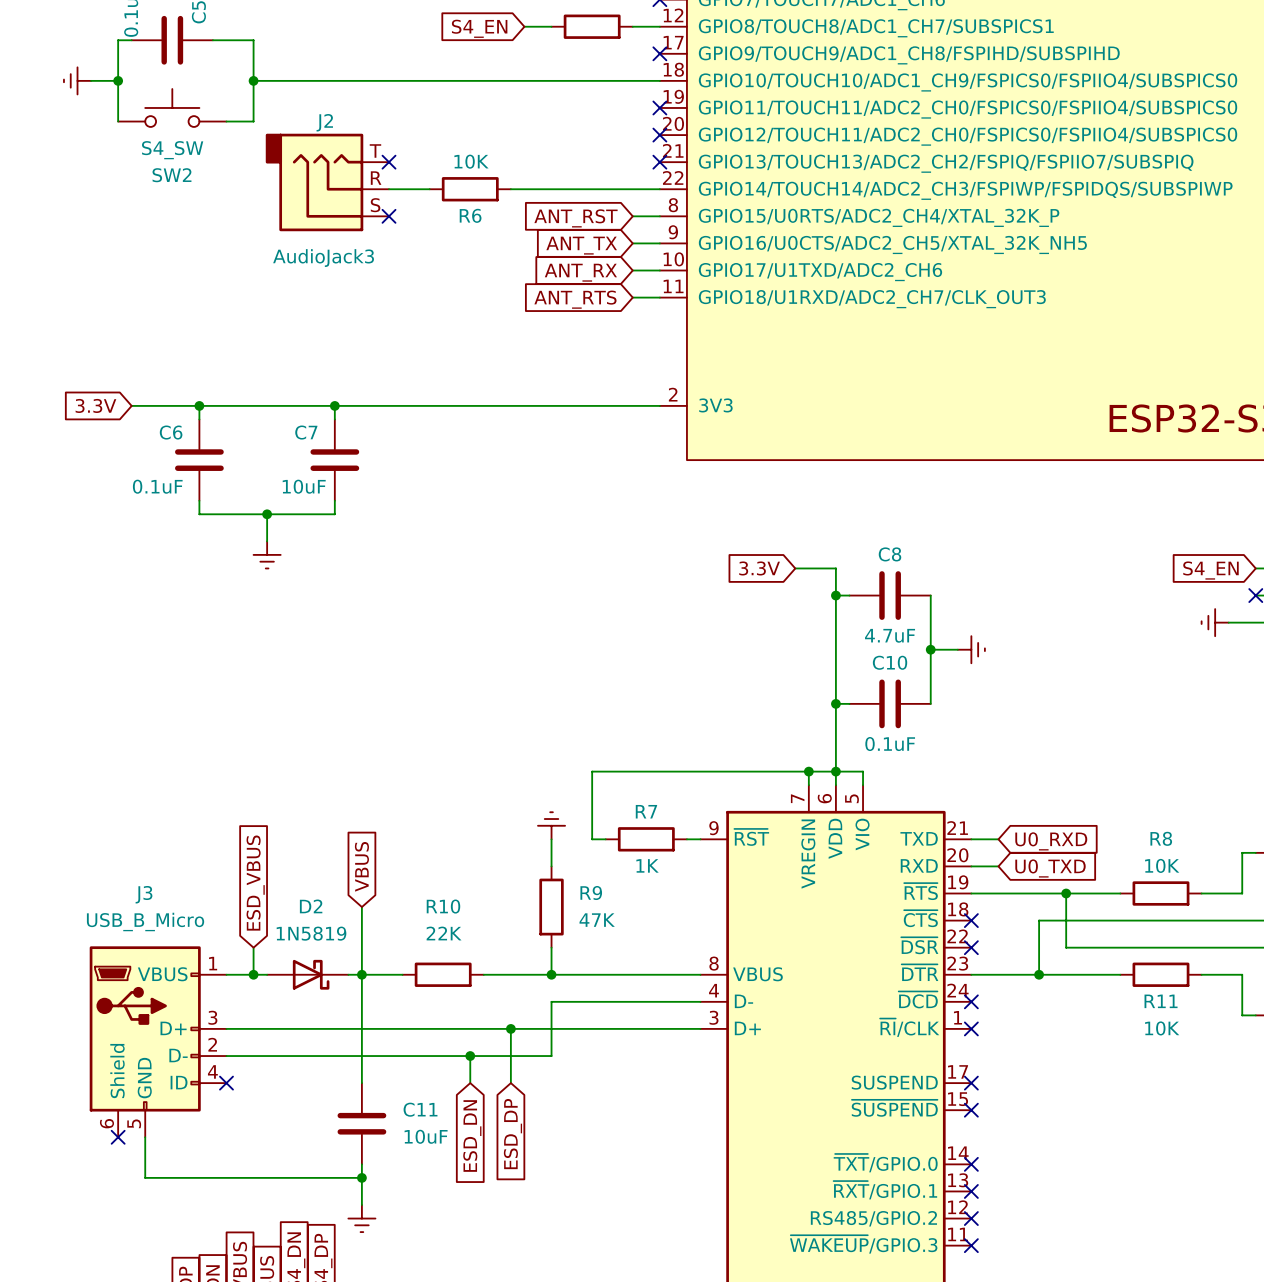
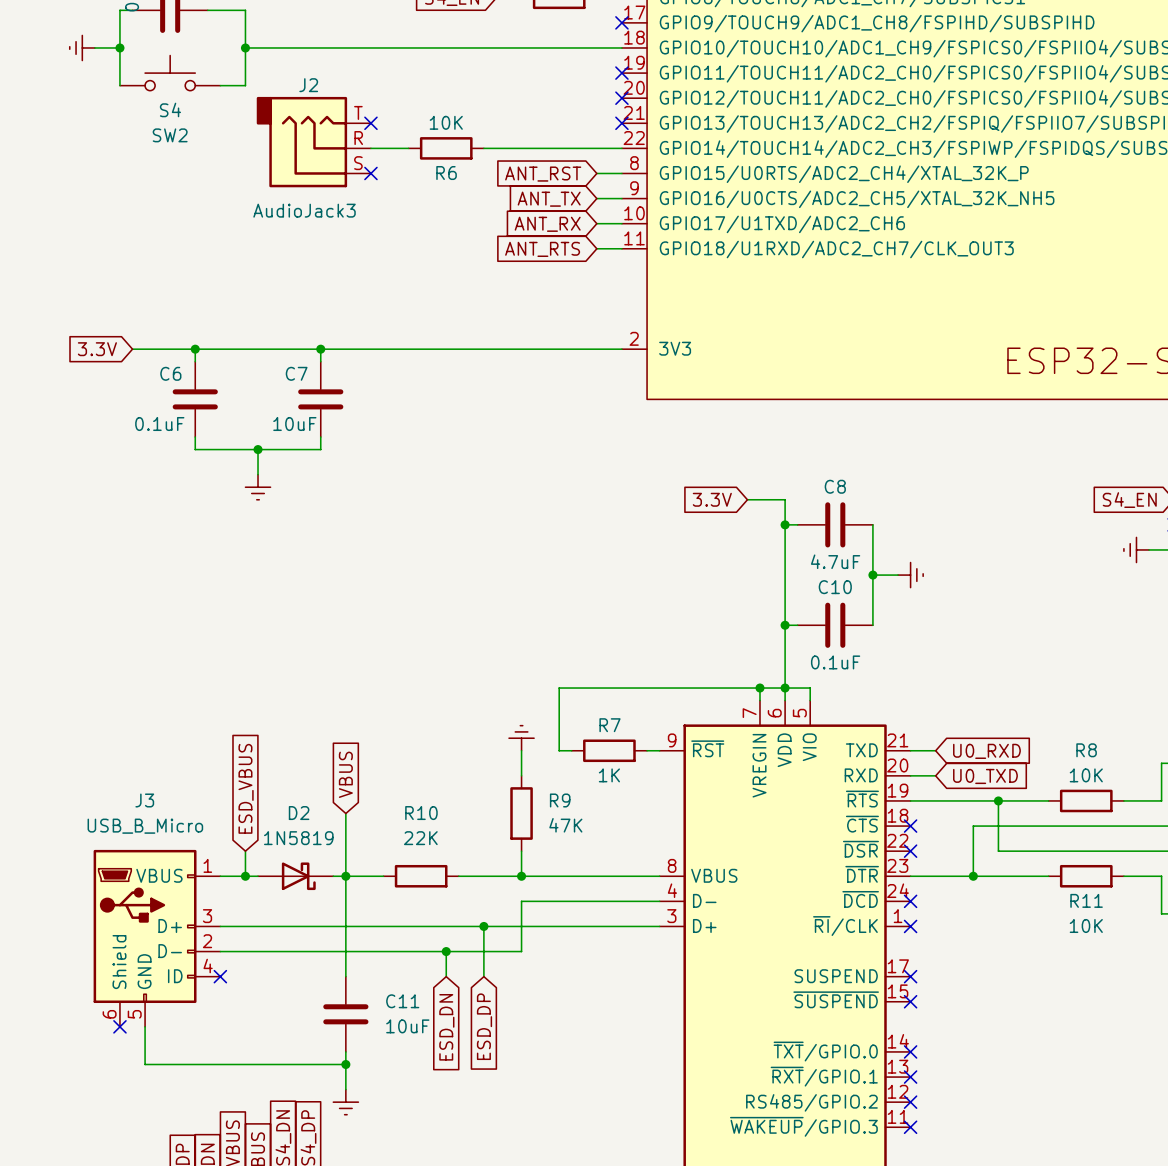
SW2 value: S4_SW (172, 150) -> S4 (170, 109)

